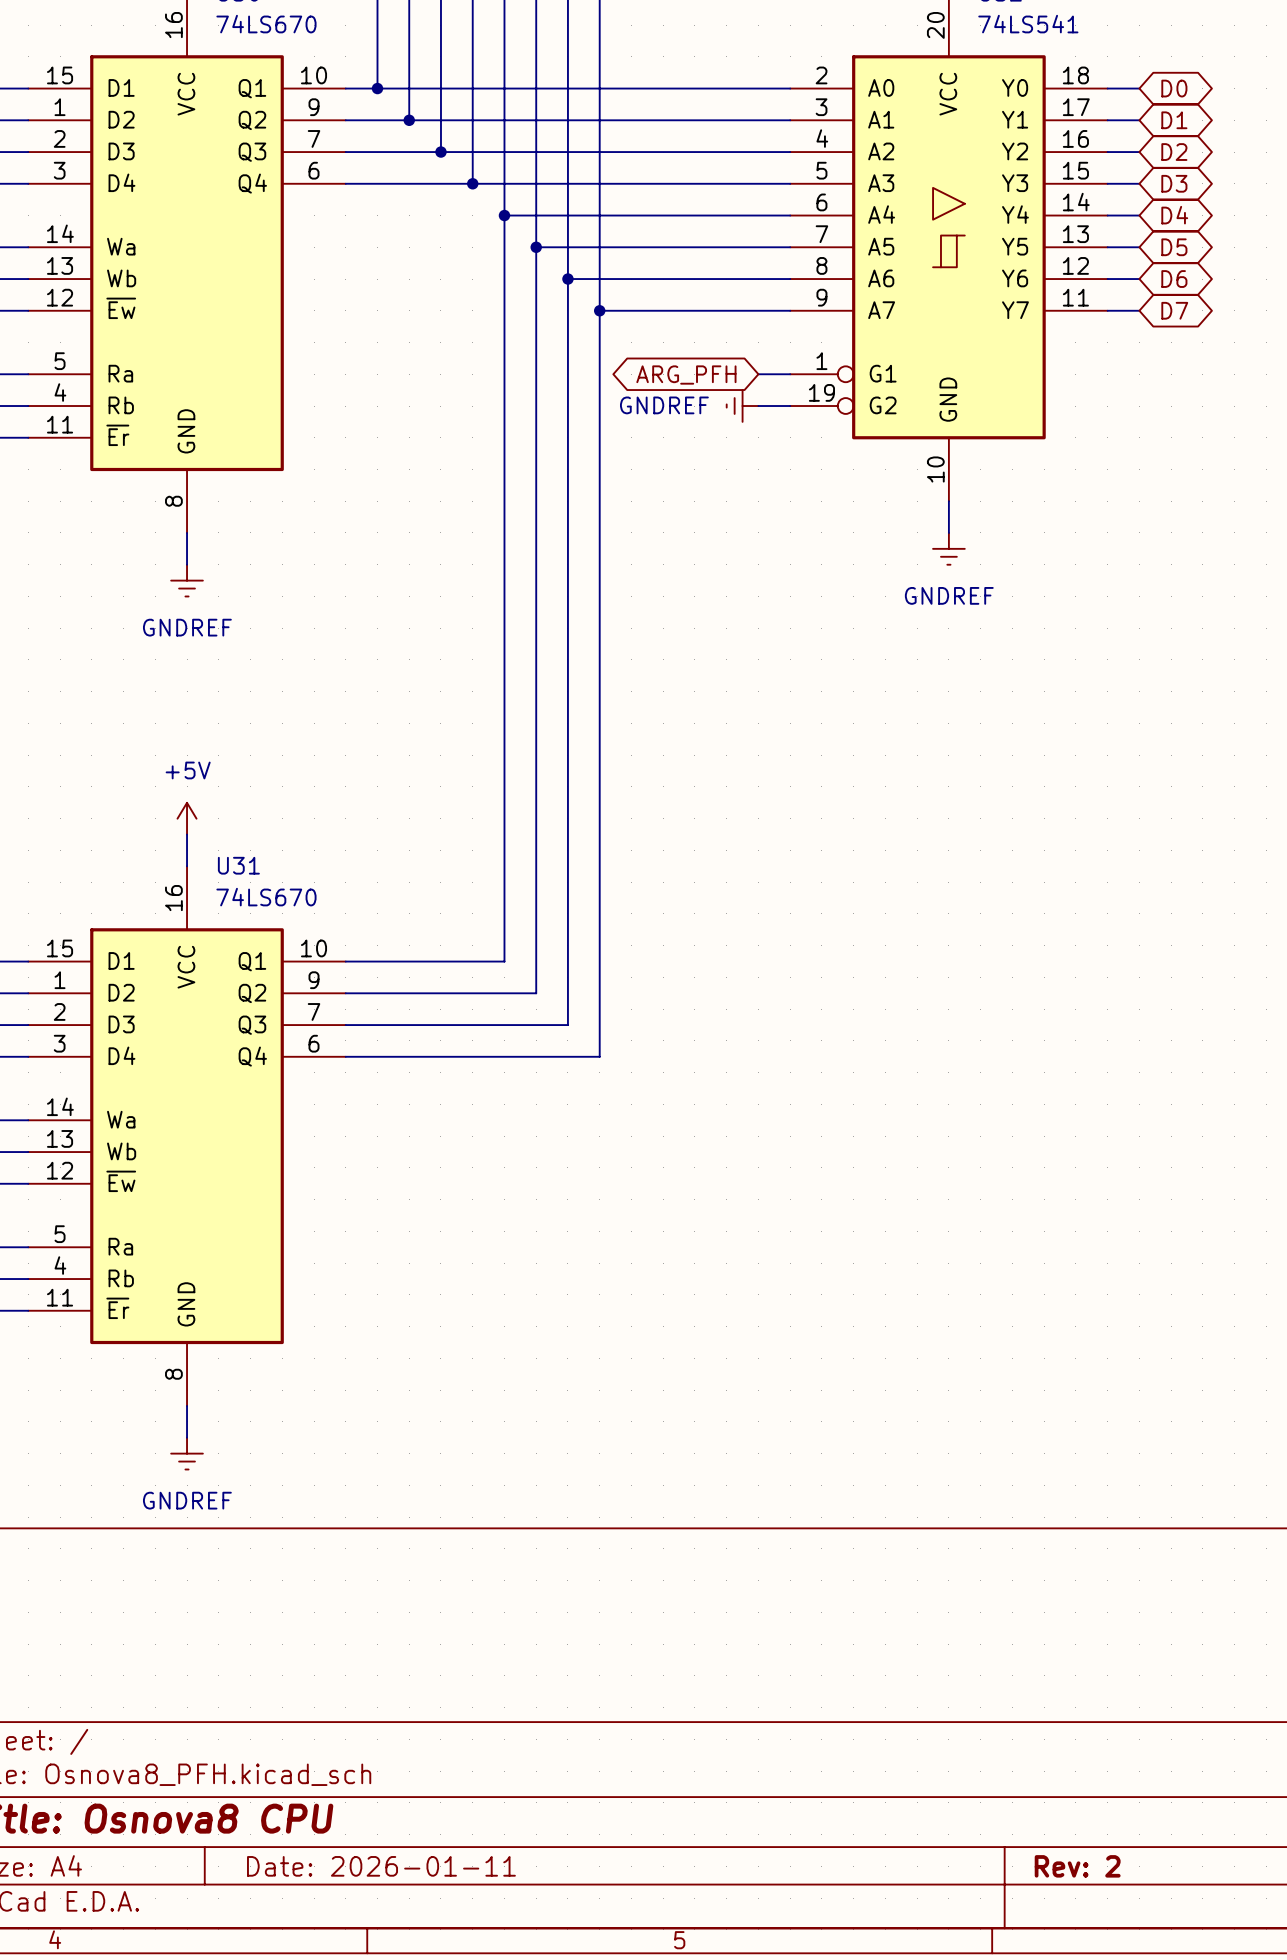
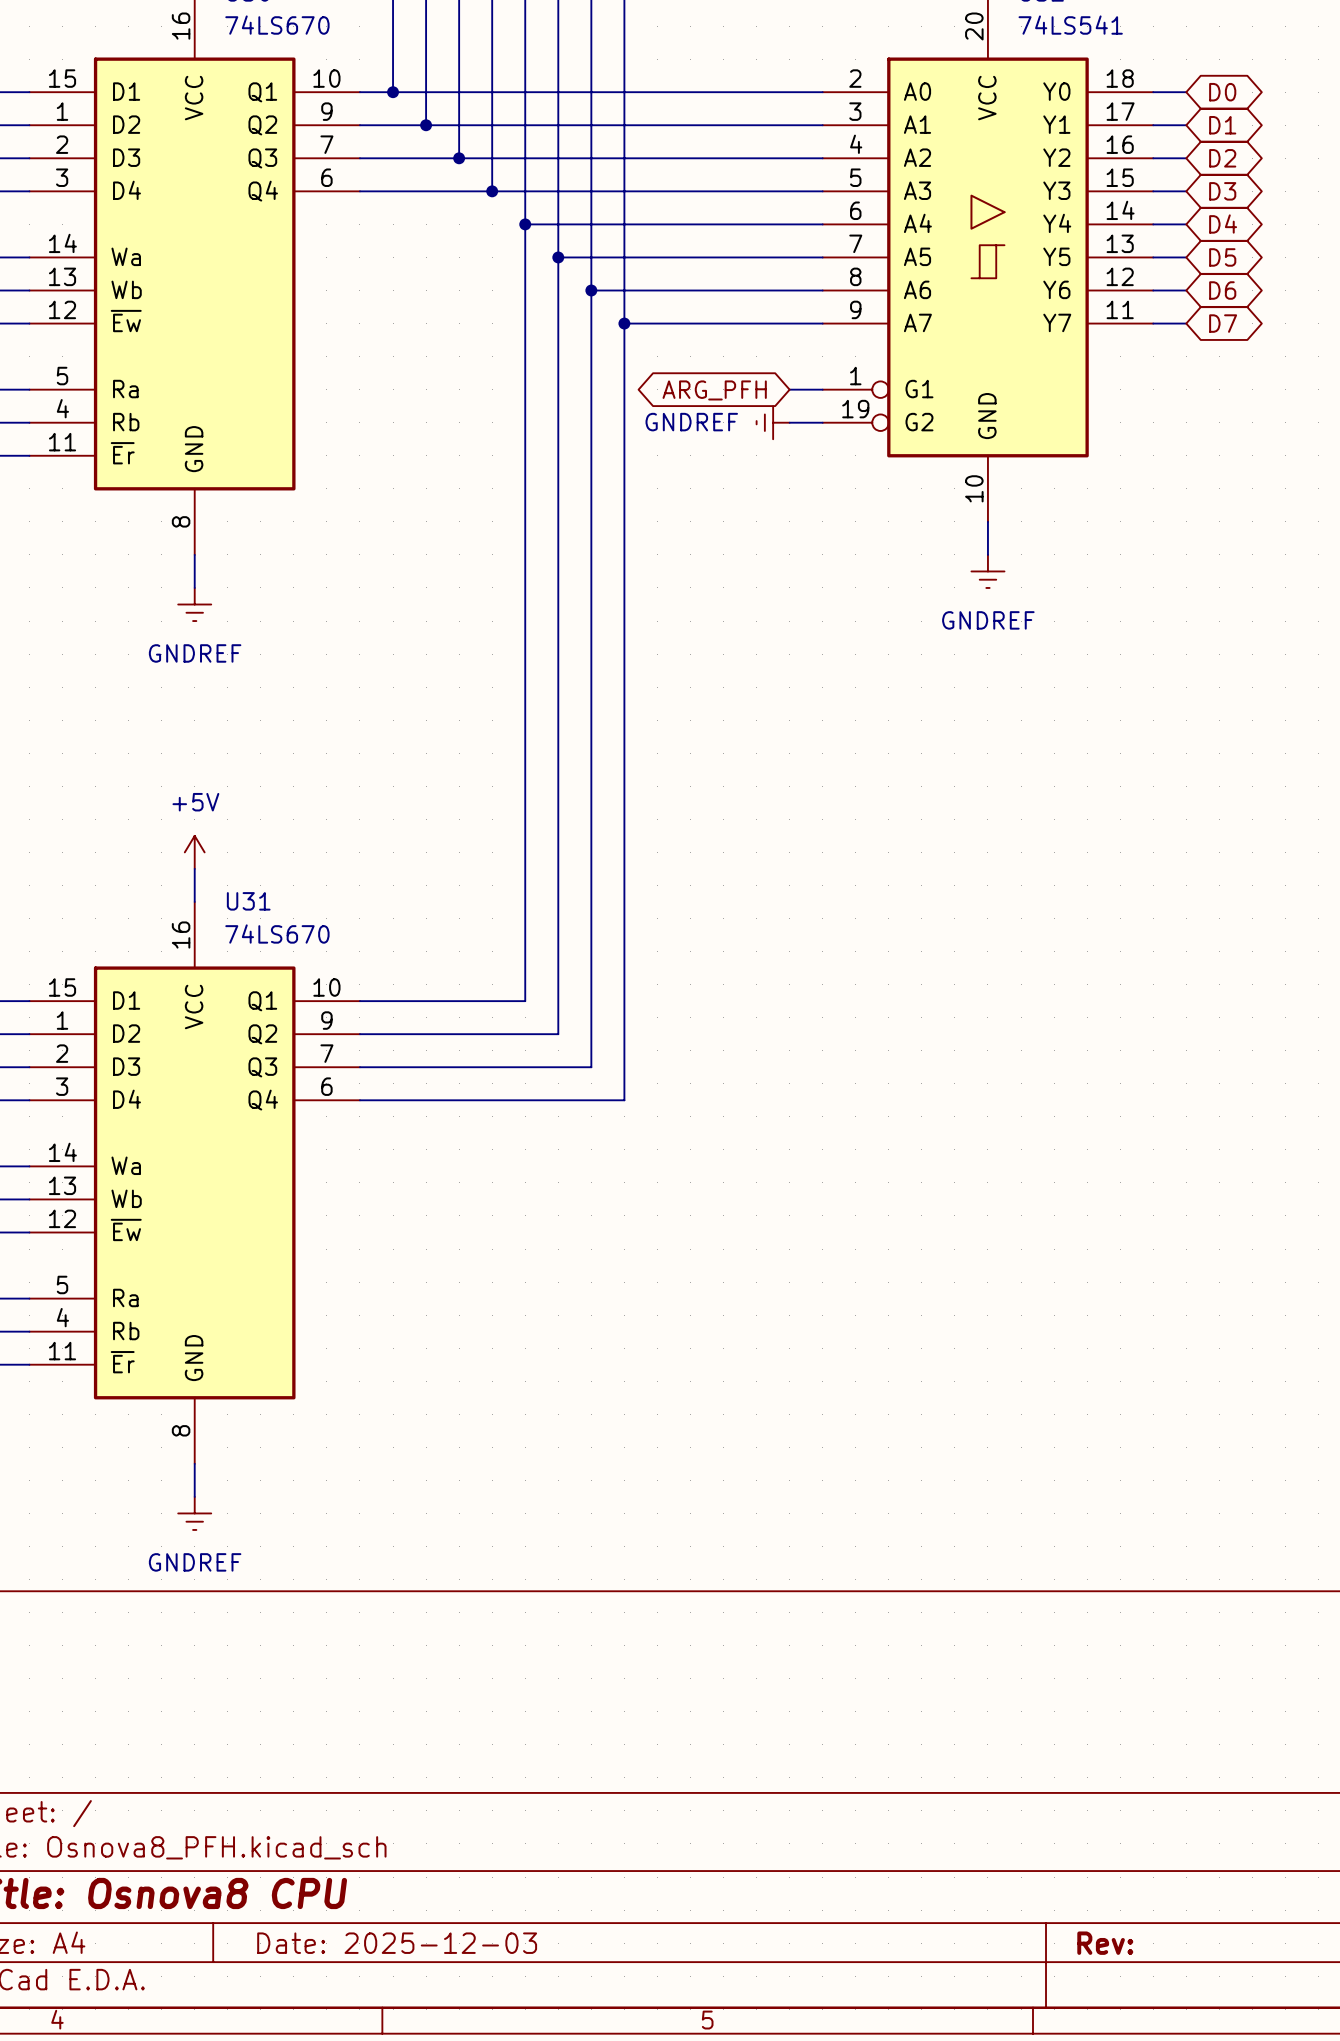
title block: Date: 2026-01-11 (381, 1866) -> Date: 2025-12-03 (397, 1943)
title block: Rev: 2 (1077, 1866) -> Rev: (1105, 1943)

